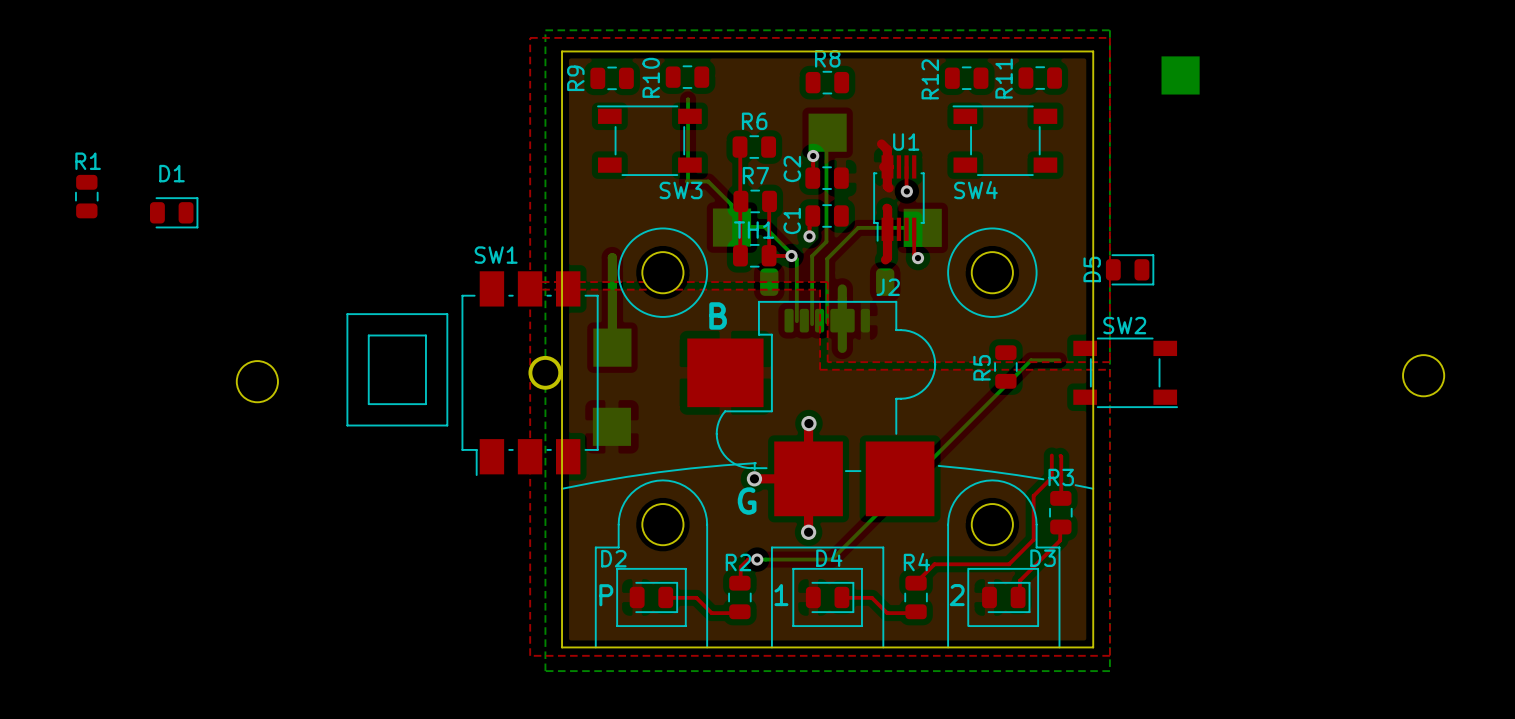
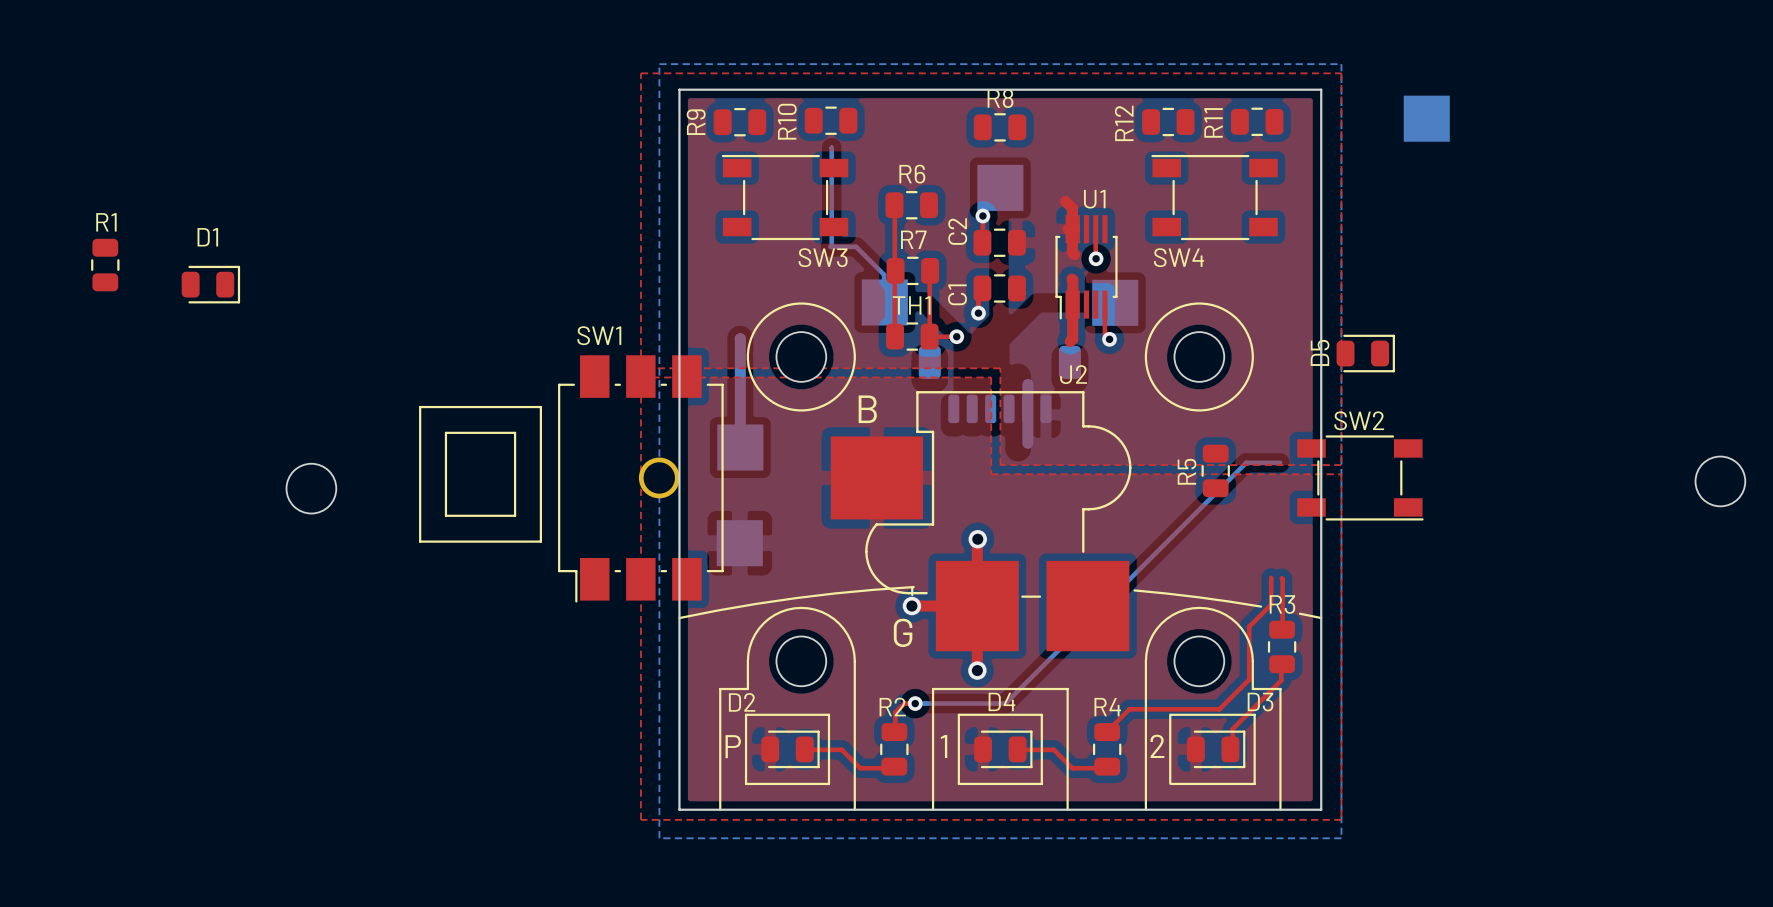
bottom track: (826, 132) (826, 241) (812, 256) (812, 324) -> none
bottom track: (722, 226) (764, 226) (796, 259) (796, 321) -> none
bottom track: (929, 227) (858, 227) (827, 258) (827, 322) -> none
part footprint: [760, 268, 895, 333] -> [918, 345, 1081, 424]
bottom track: (842, 288) (842, 348) -> none
bottom track: none -> (1027, 384) (1027, 443)

